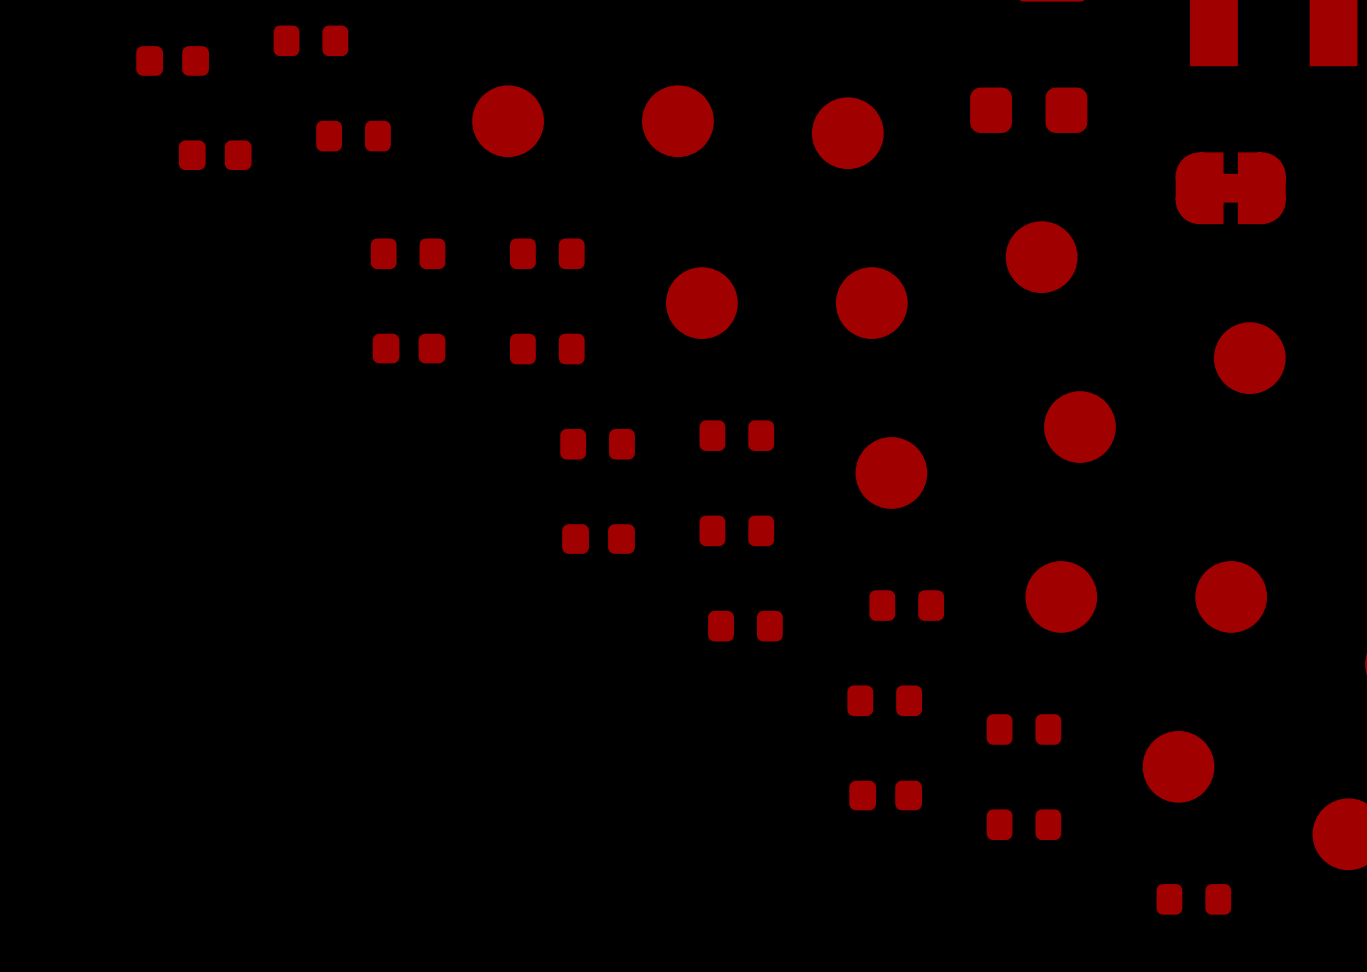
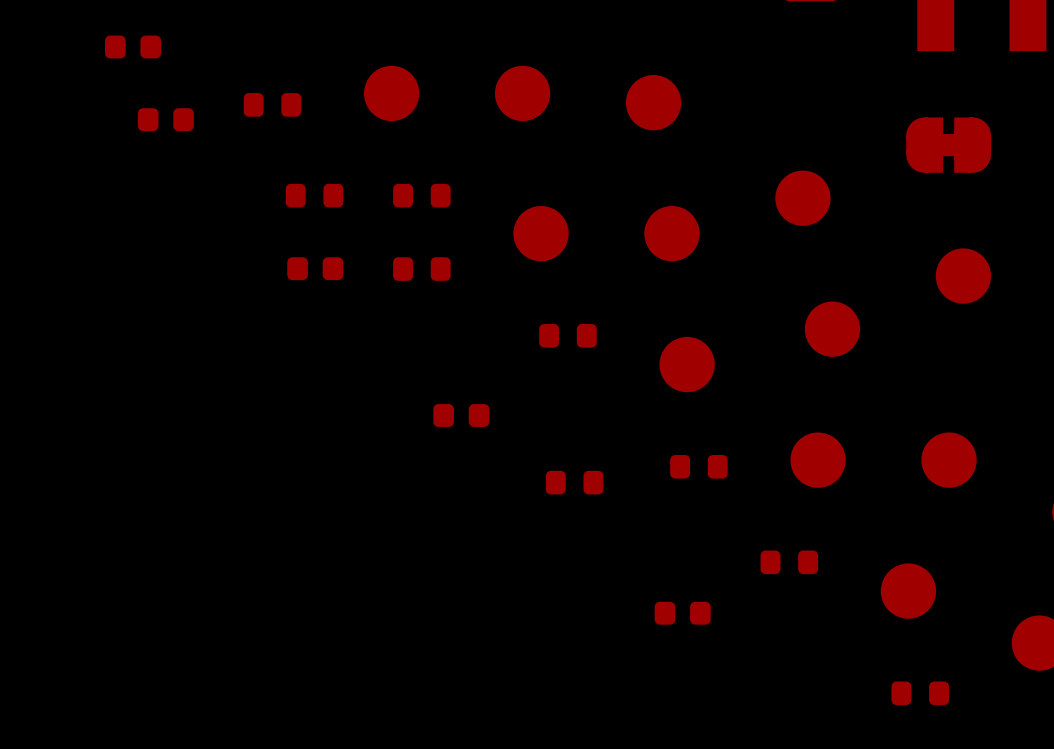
part: (310, 40) -> none
part: (1028, 110) -> none
part: (597, 444) -> none
part: (736, 530) -> none
part: (884, 700) -> none
part: (1023, 824) -> none

